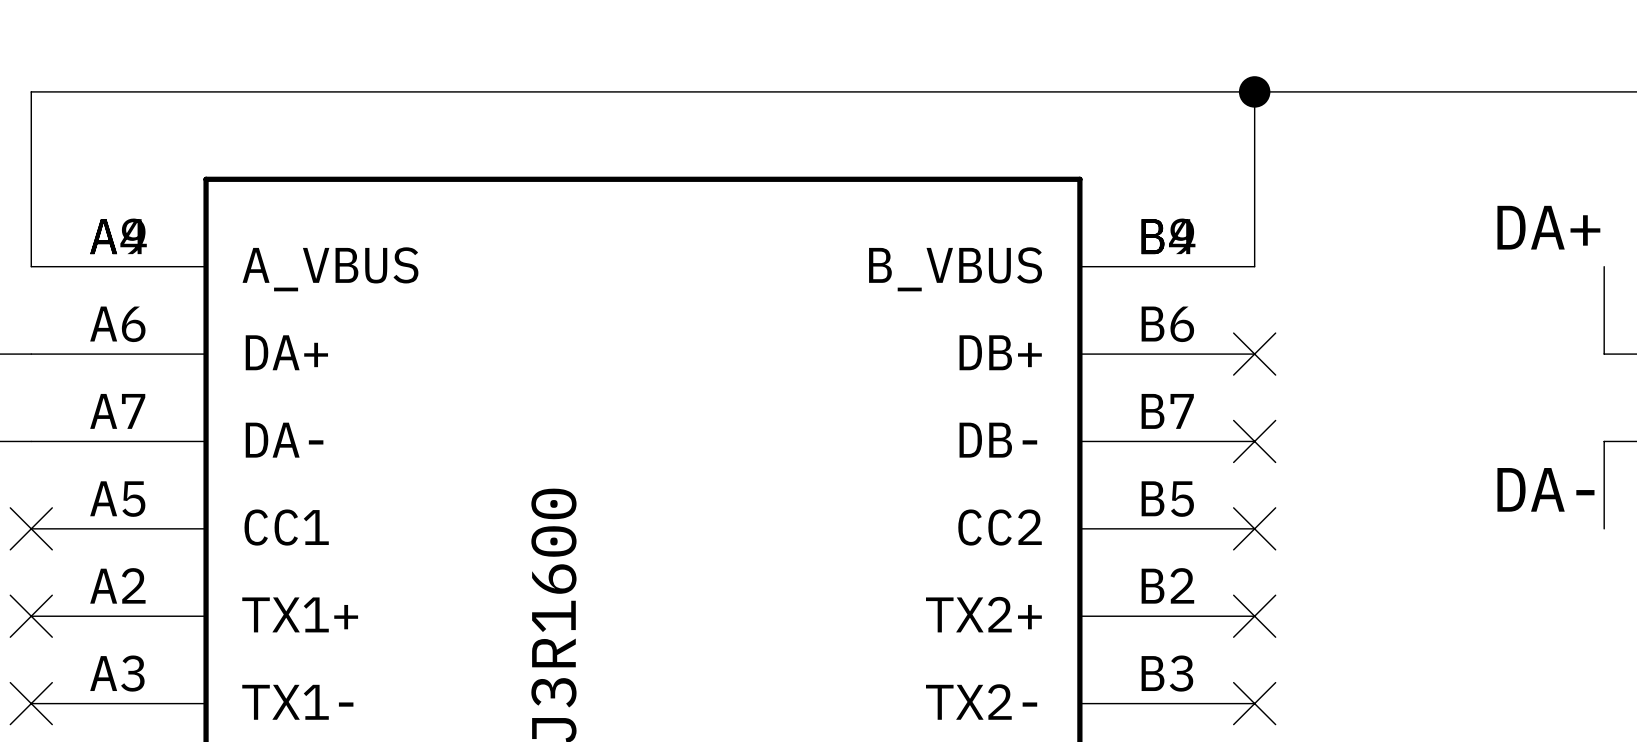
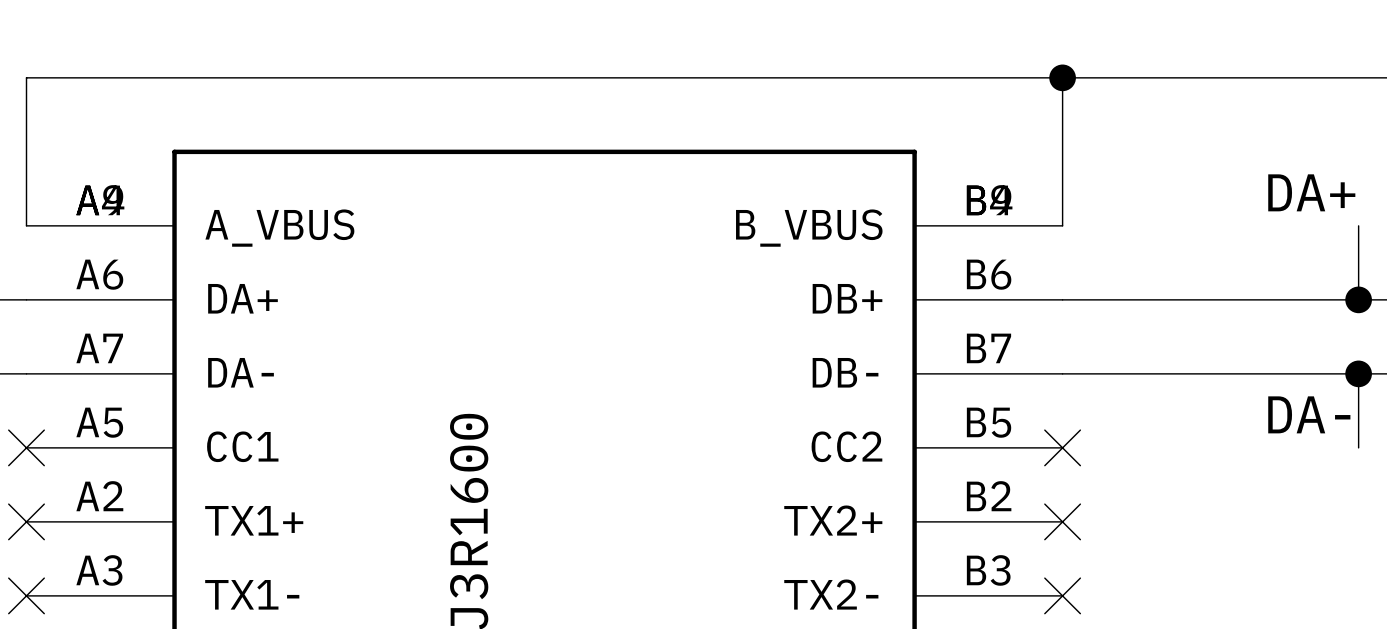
wire: none -> (1062, 299) (1358, 299)
no-connect mark: (1254, 354) -> none
junction: none -> (1358, 299)
wire: none -> (1062, 373) (1358, 373)
no-connect mark: (1254, 441) -> none
junction: none -> (1358, 373)

